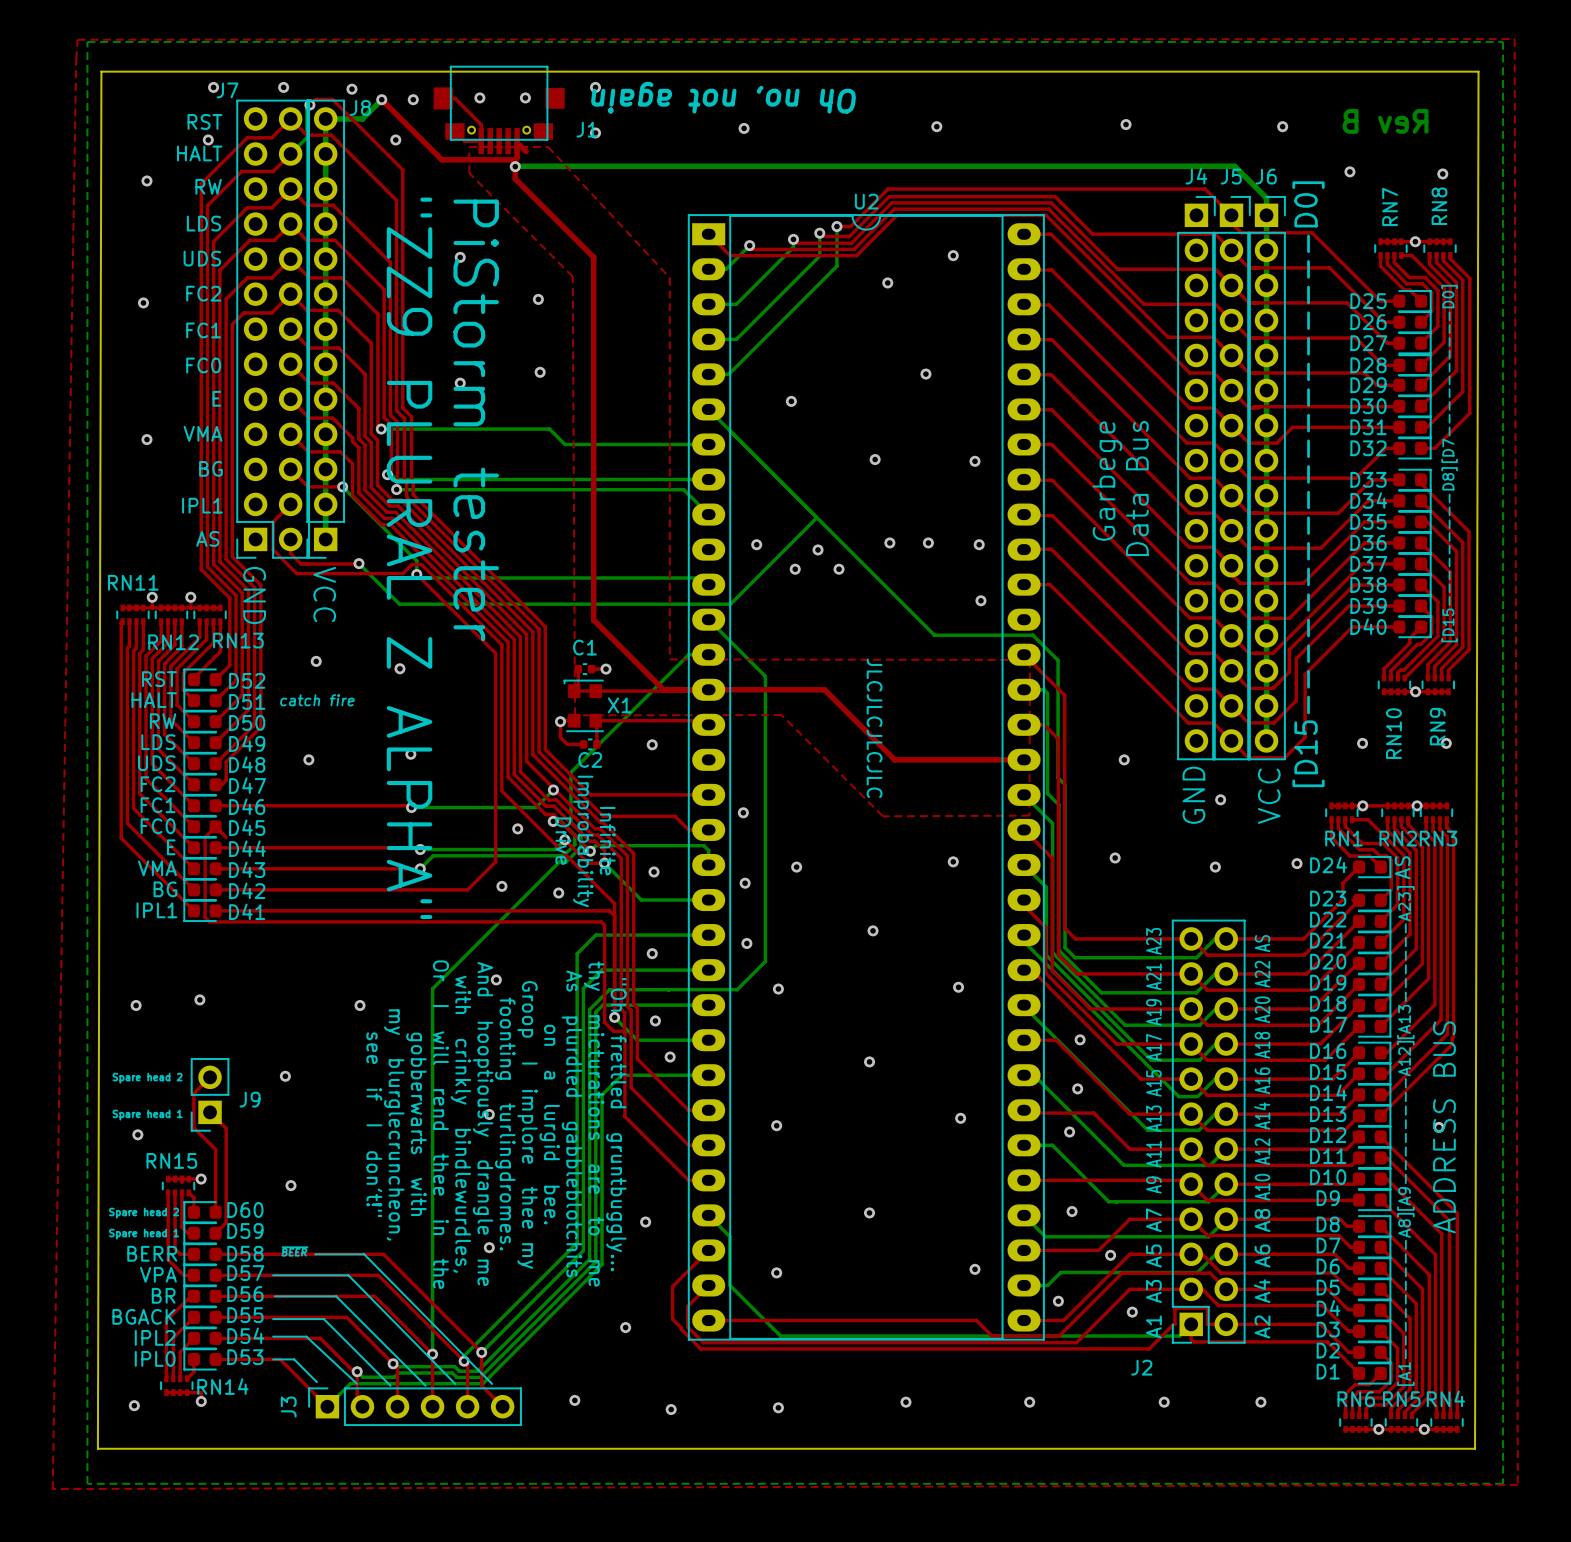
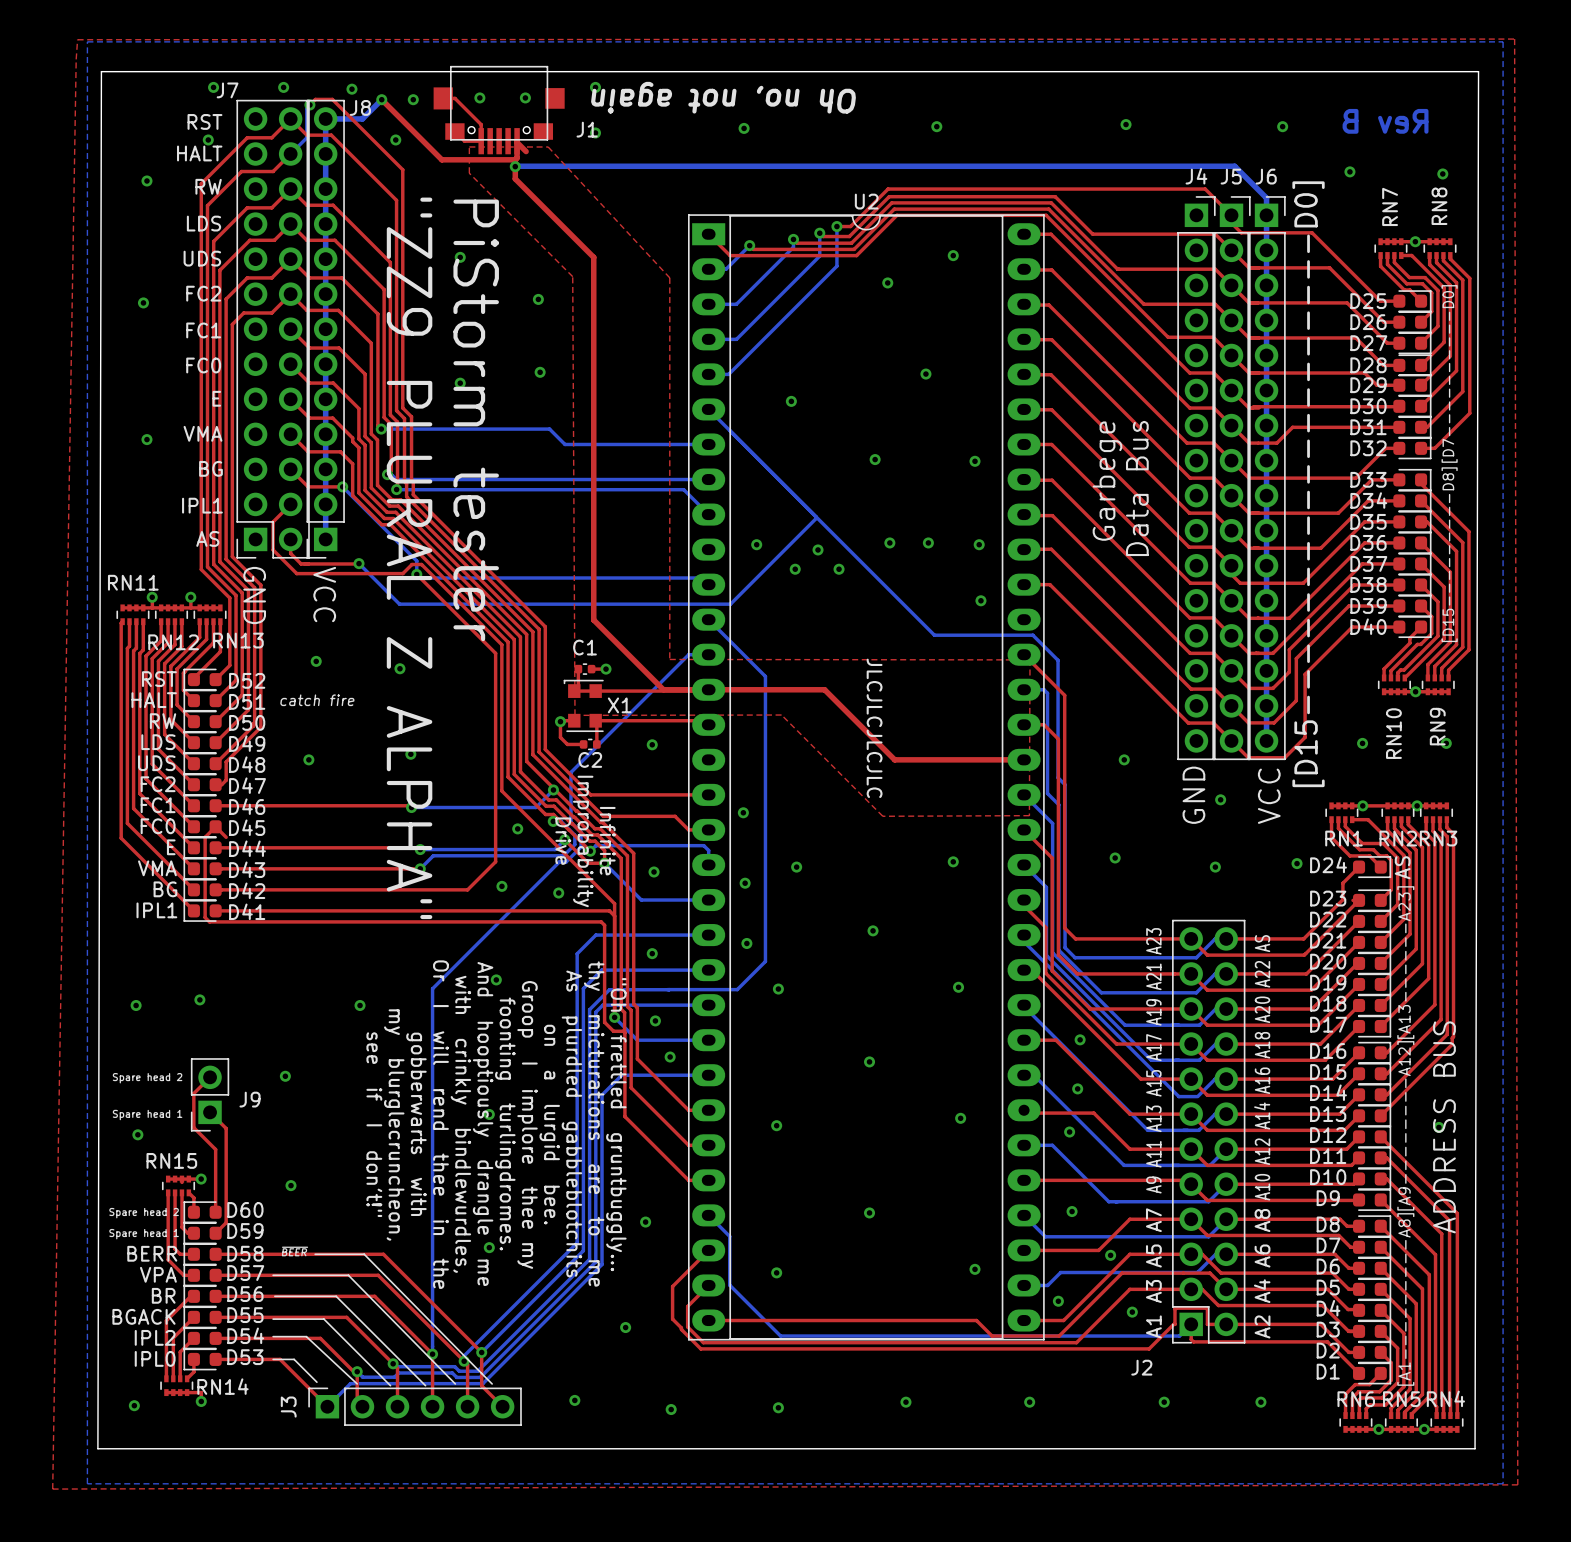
U2 footprint: [687, 214, 1045, 1341] -> [687, 214, 1045, 1341]

